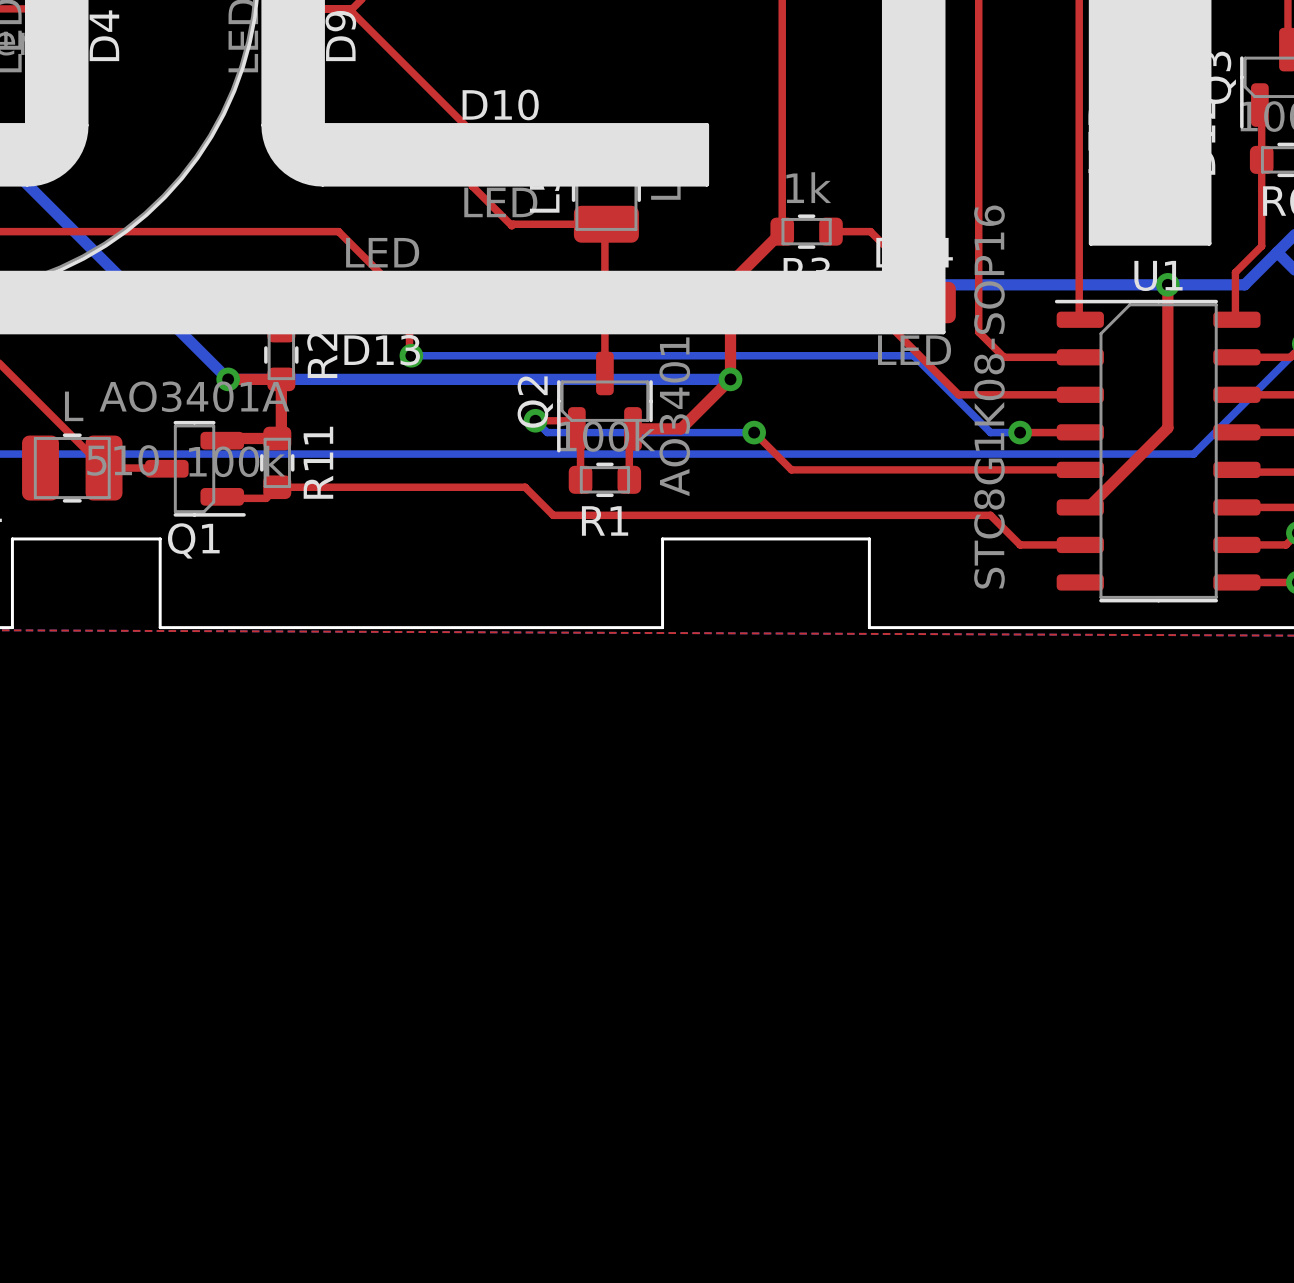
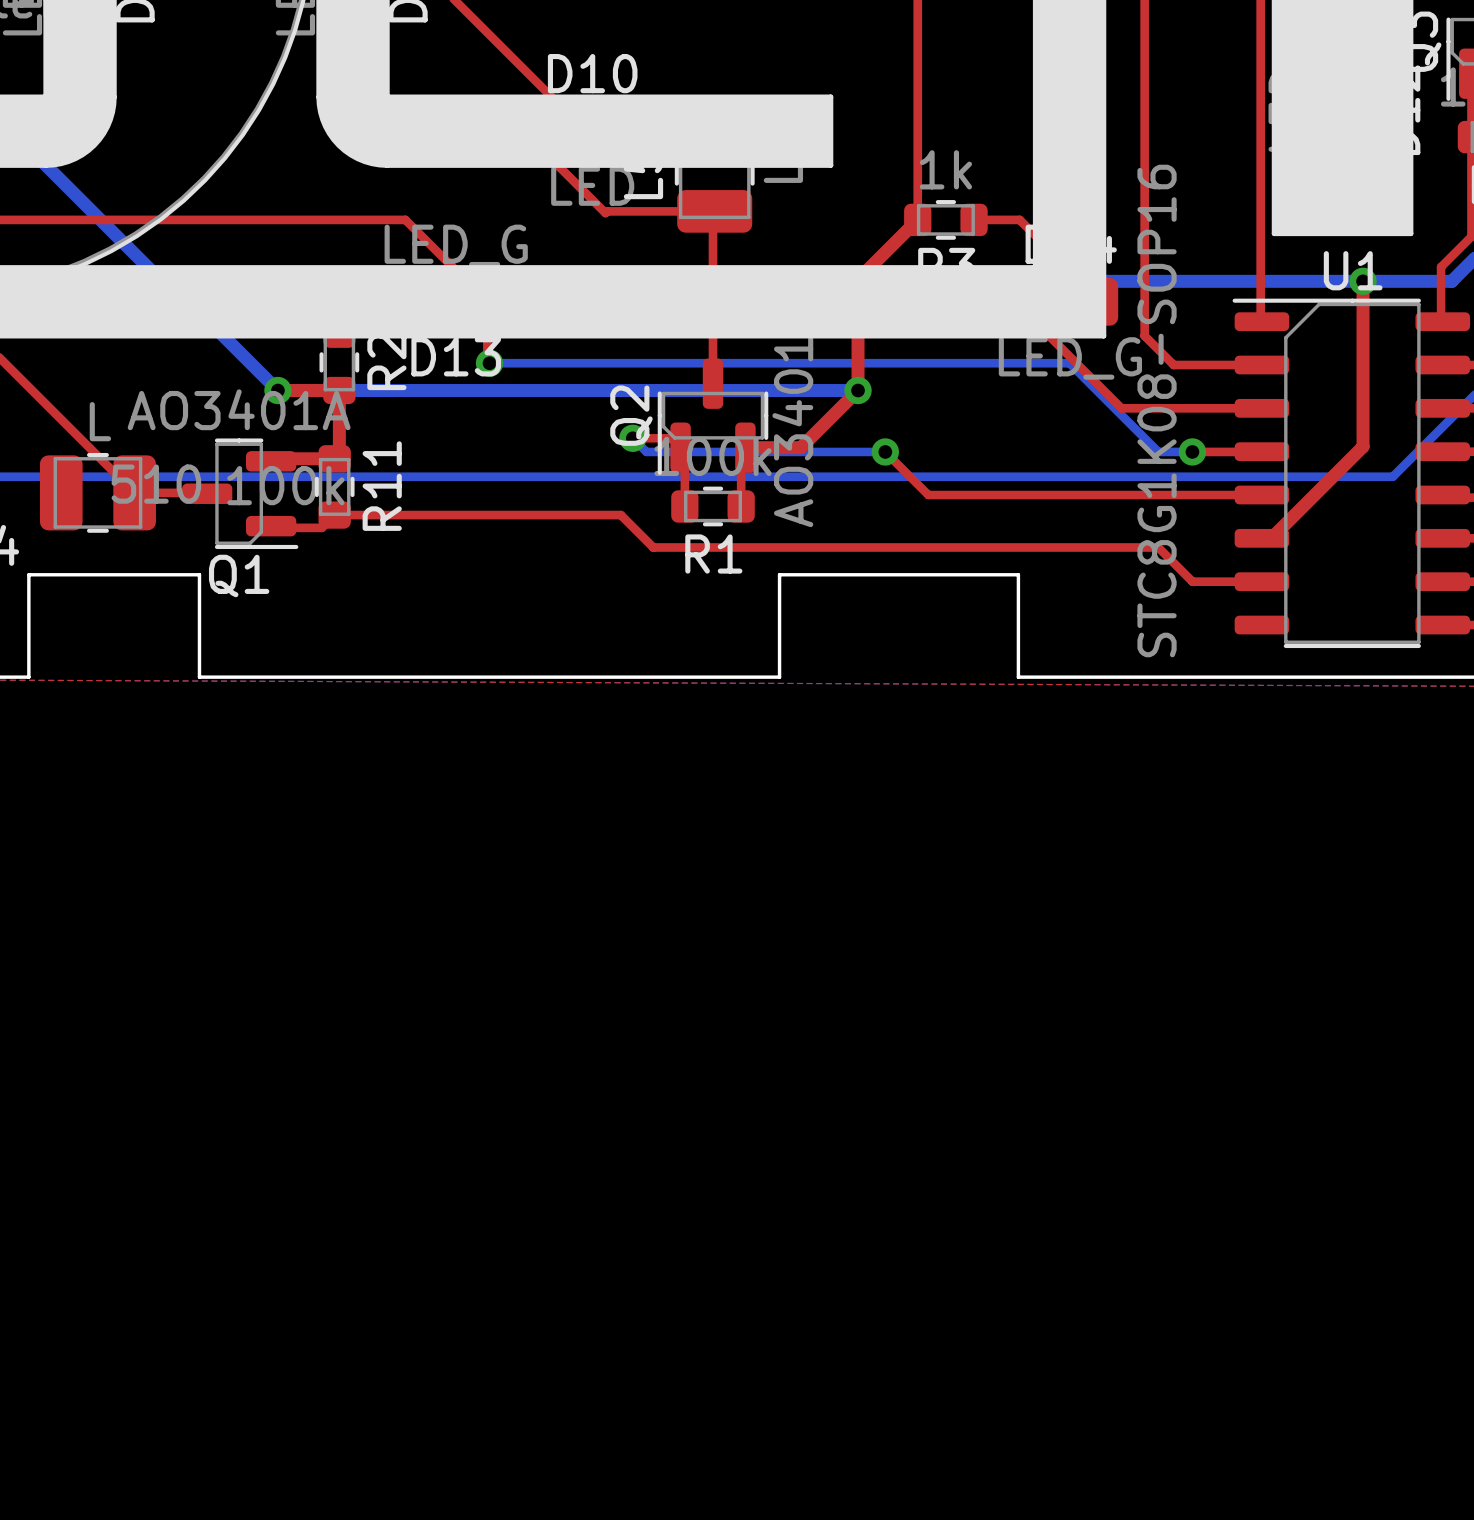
D13 value: LED (382, 252) -> LED_G (456, 245)
part value: LED (914, 350) -> LED_G (1070, 358)

